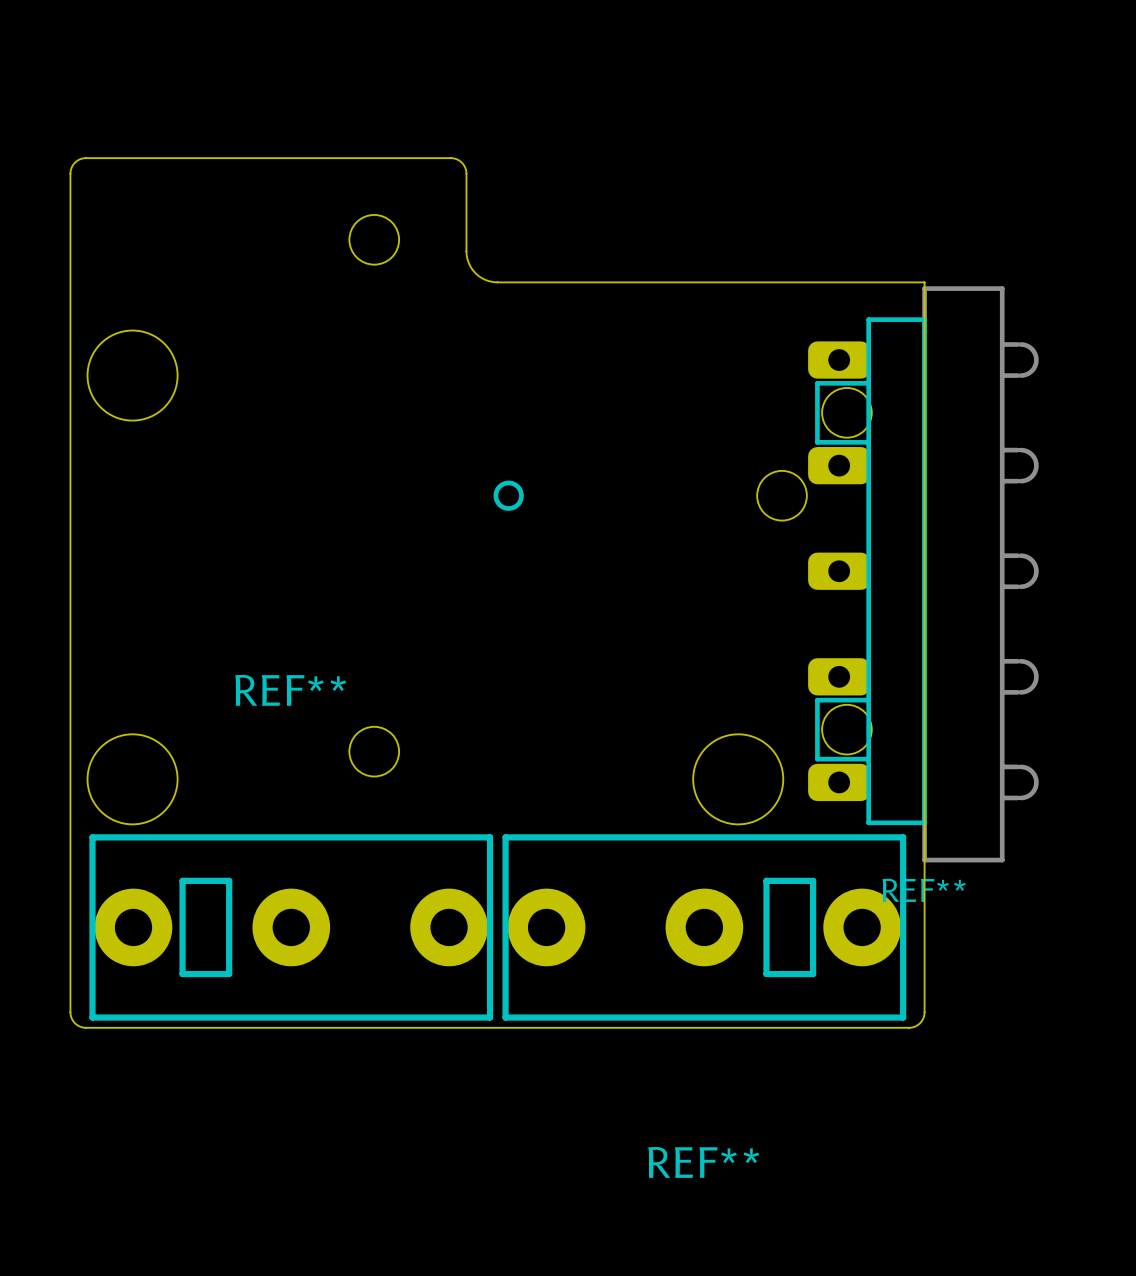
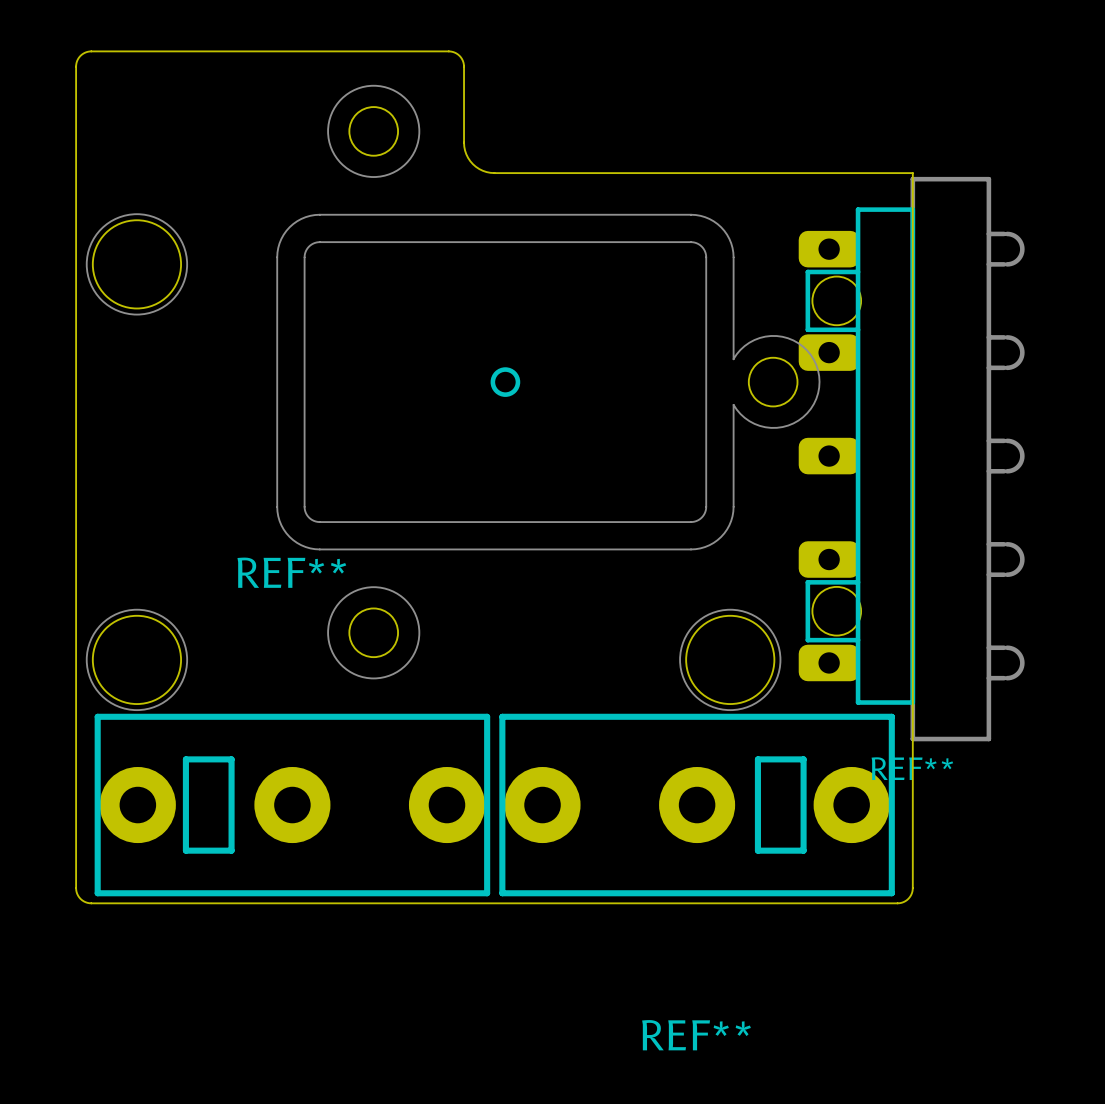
drawing: none -> [327, 85, 420, 178]
drawing: none -> [86, 214, 188, 315]
line: none -> (319, 242) (691, 242) (700, 245) (704, 250) (706, 257) (706, 506) (702, 516) (697, 520) (691, 522) (319, 522) (310, 518) (305, 512) (304, 506) (304, 257) (309, 246) (319, 242)
line: none -> (733, 359) (736, 354) (744, 346) (759, 338) (771, 335) (788, 338) (803, 346) (813, 359) (818, 370) (819, 387) (813, 403) (807, 413) (793, 423) (782, 427) (771, 427) (754, 423) (740, 414) (733, 404) (732, 516) (727, 529) (721, 536) (705, 547) (691, 549) (315, 549) (301, 545) (293, 540) (286, 533) (279, 520) (277, 506) (277, 252) (279, 243) (286, 230) (297, 221) (305, 217) (319, 214) (691, 214) (705, 217) (721, 227) (727, 234) (732, 247) (733, 257) (733, 359)
drawing: none -> [327, 587, 420, 679]
drawing: none -> [86, 609, 188, 711]
drawing: none -> [679, 609, 781, 711]

